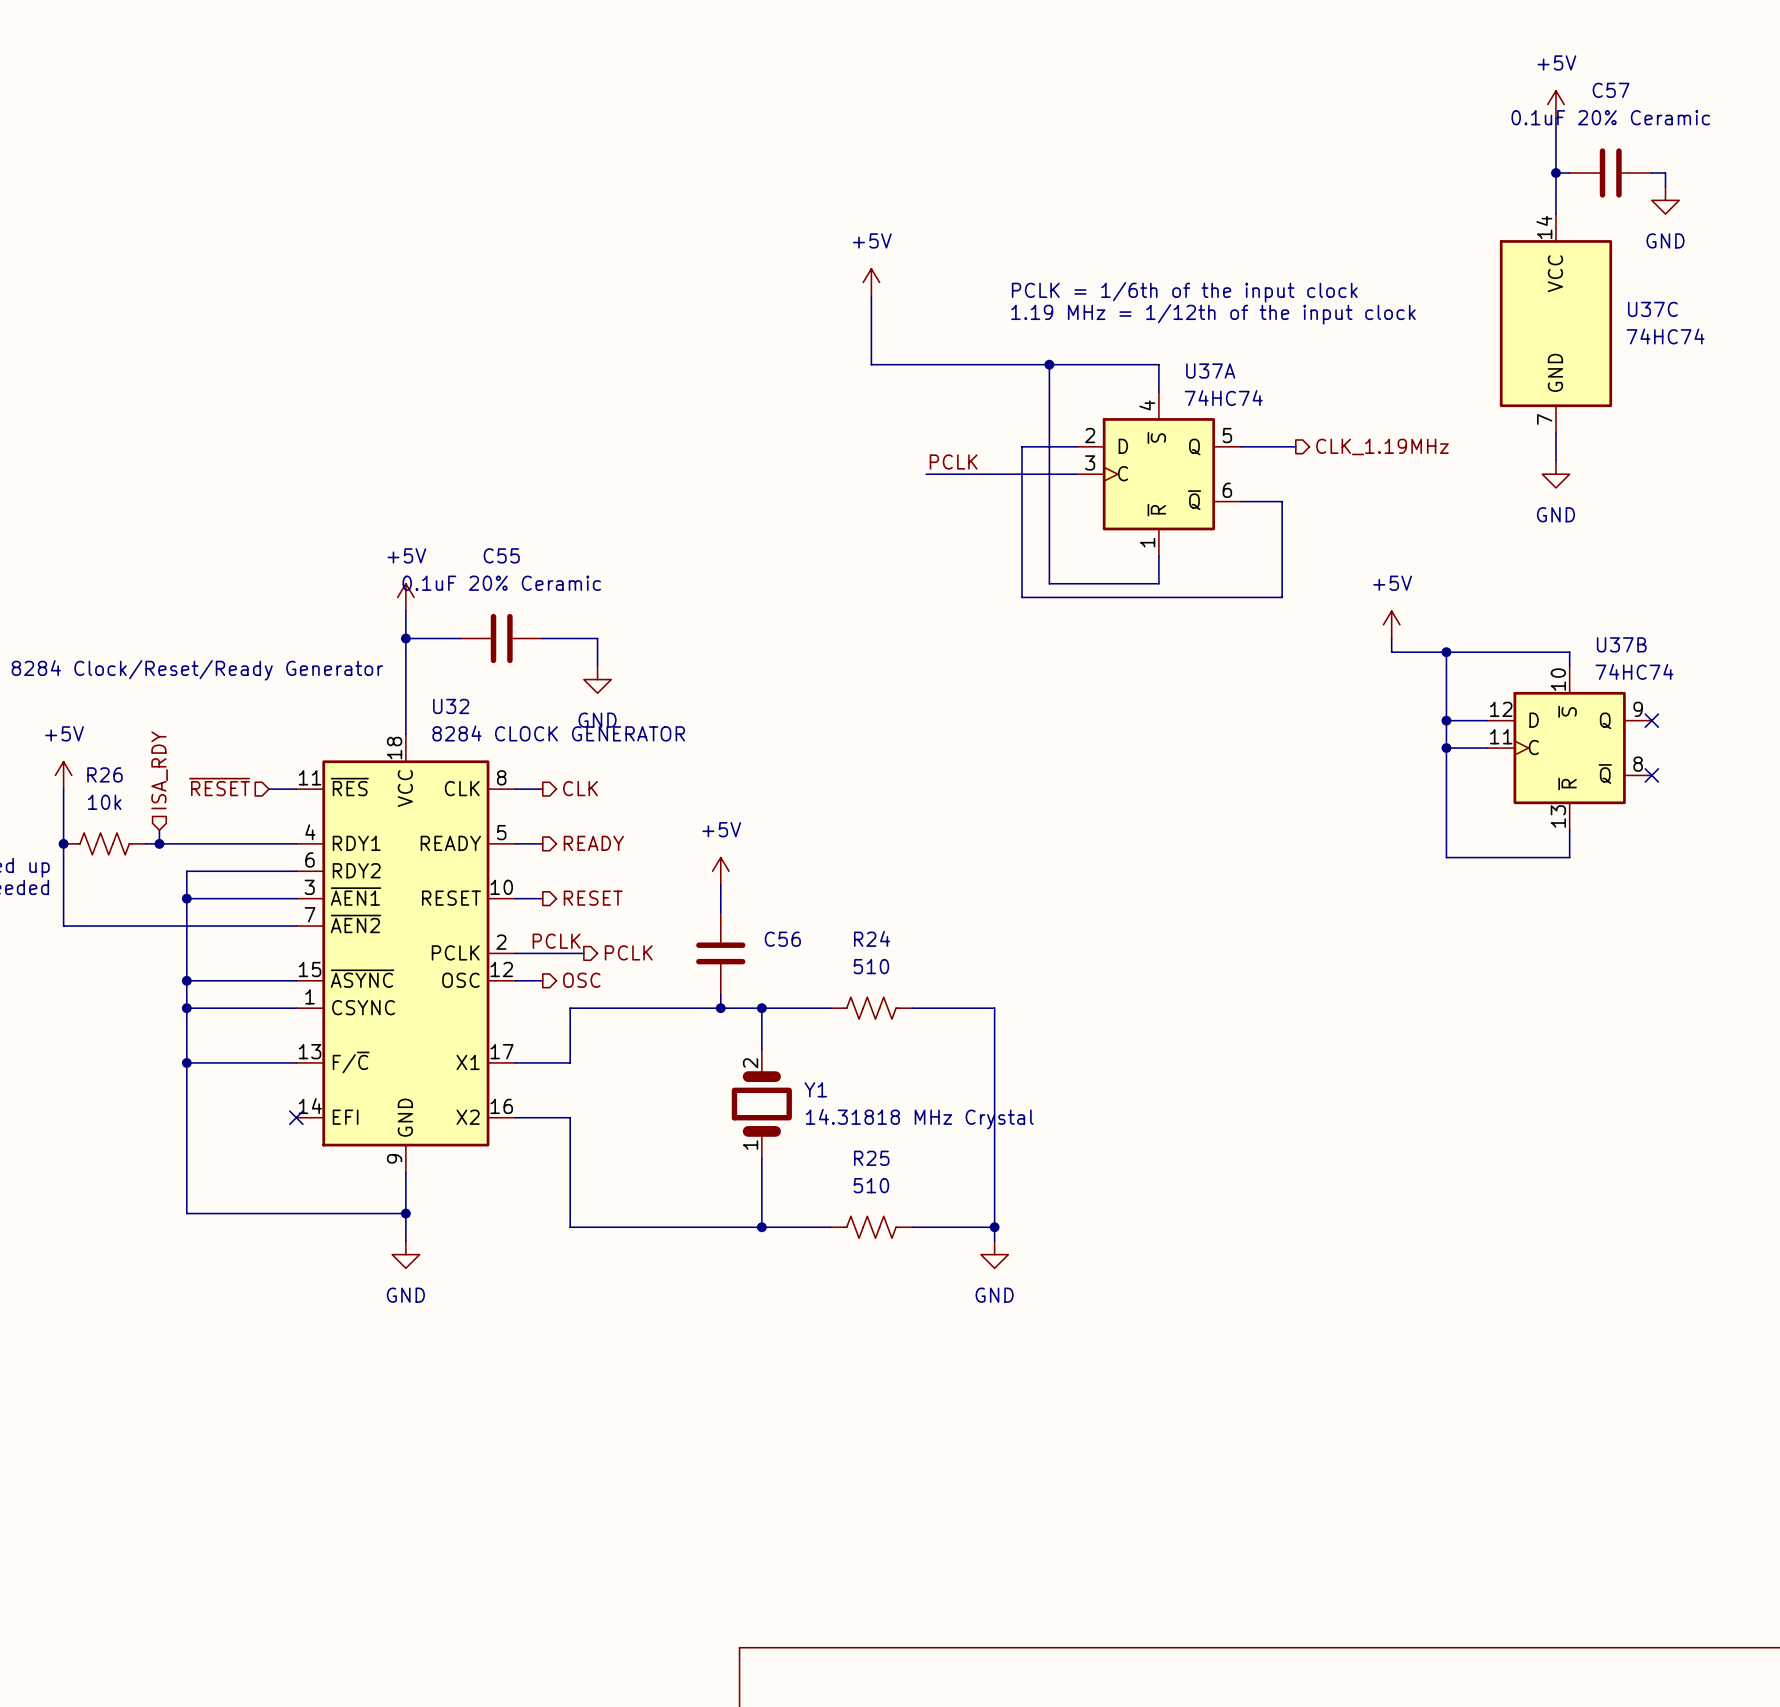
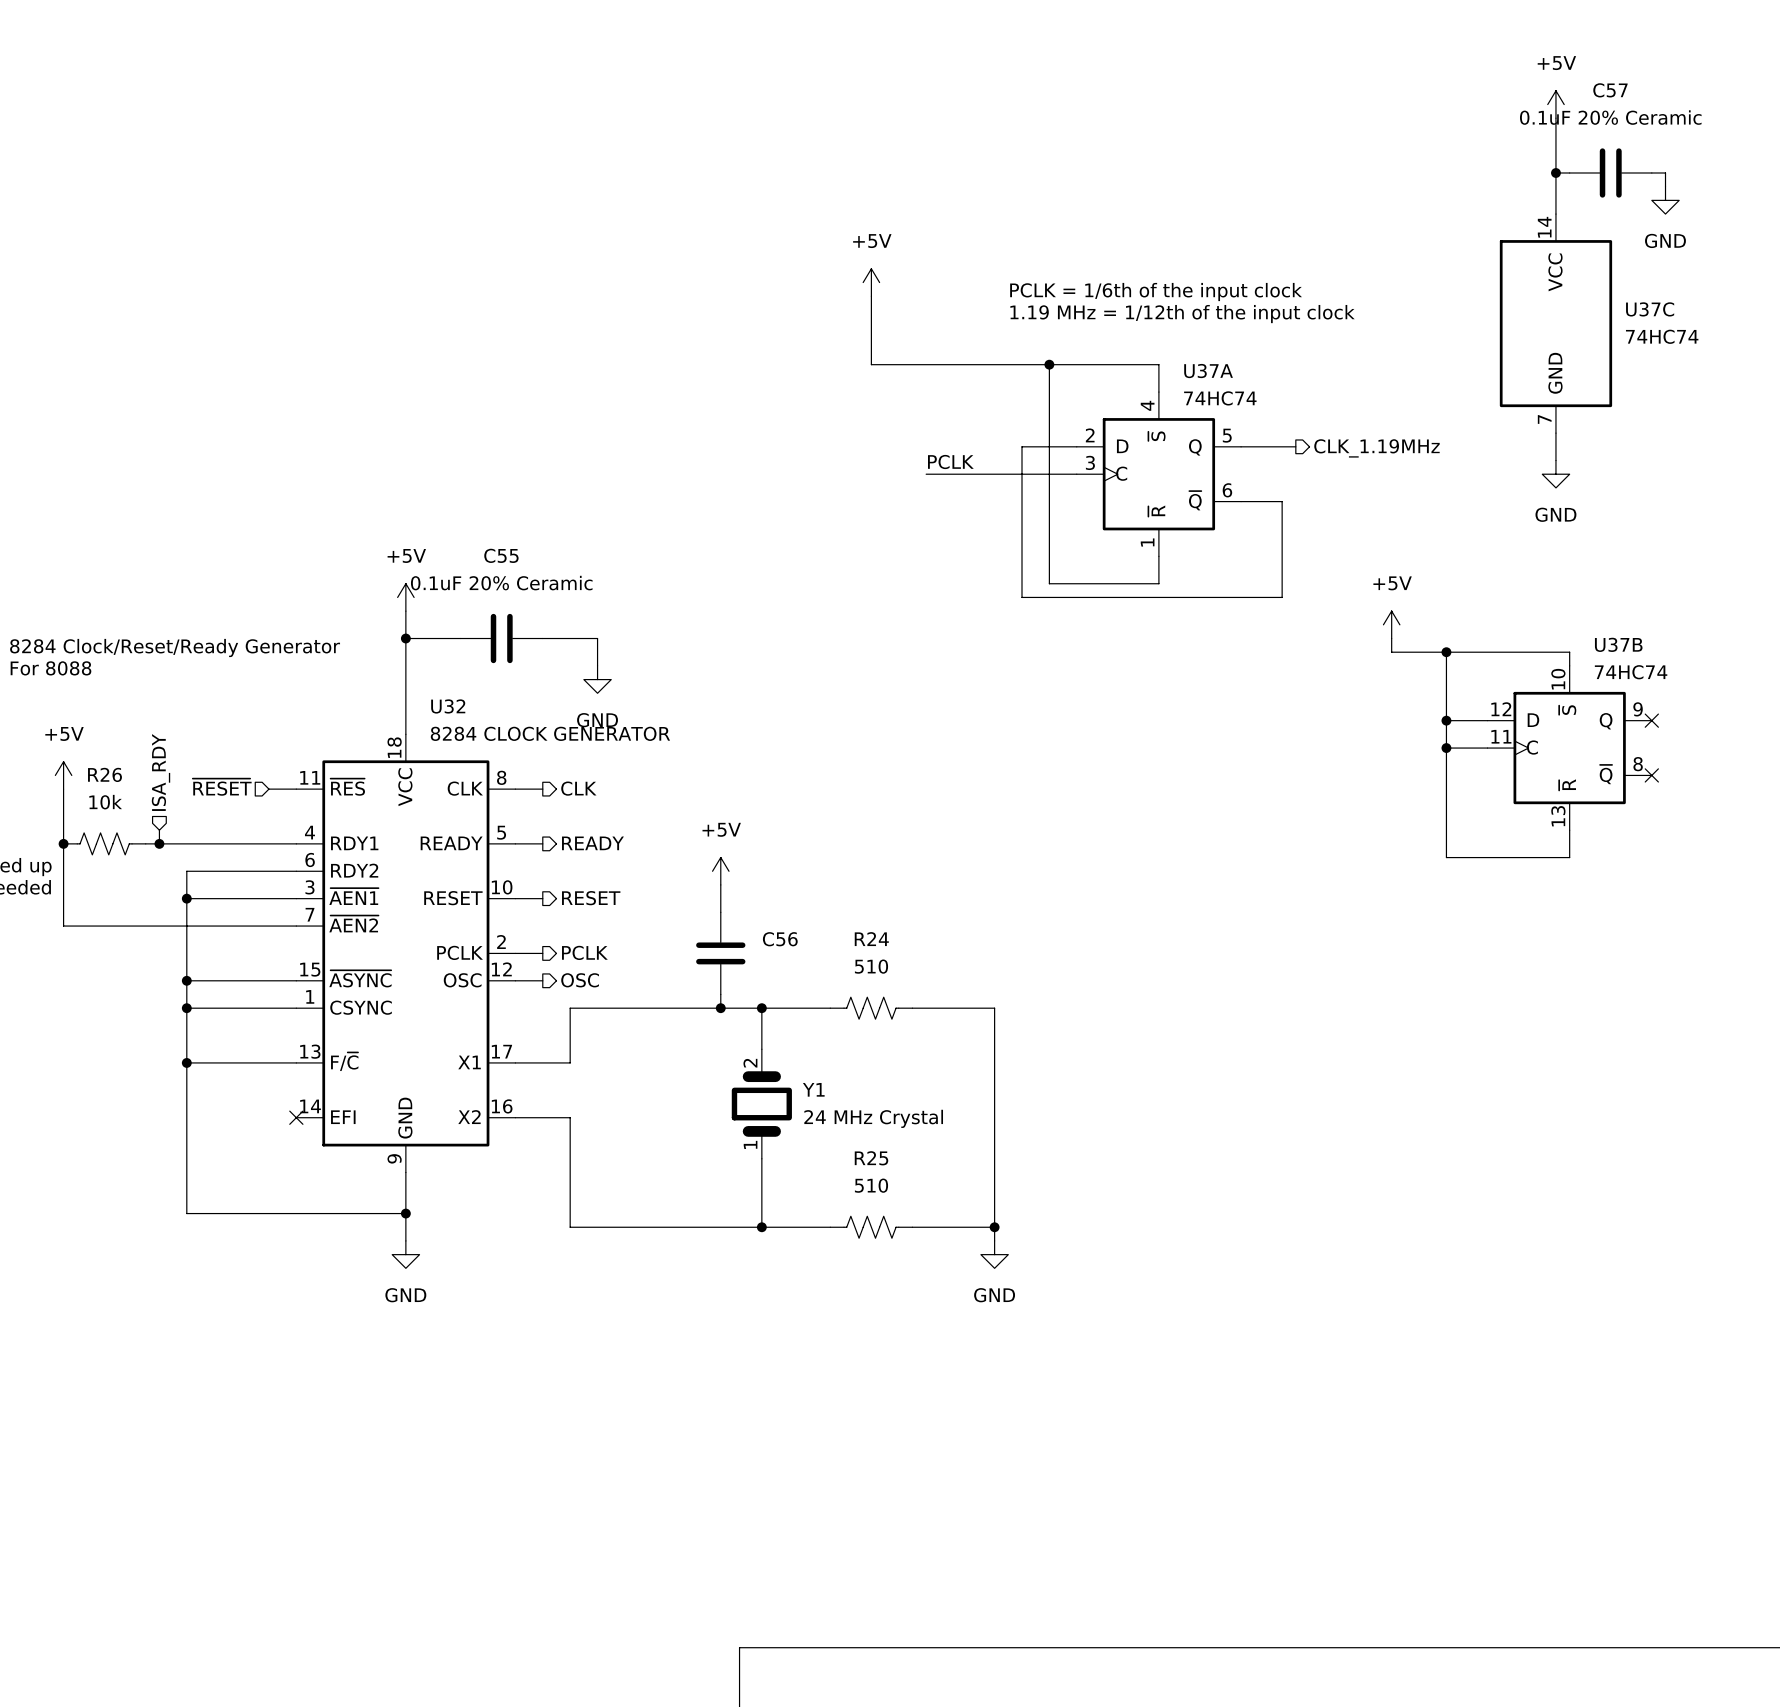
text: none -> 8284 Clock/Reset/Ready Generator (175, 647)
text: 8284 Clock/Reset/Ready Generator (197, 670) -> For 8088 (50, 668)
label: PCLK (556, 941) -> none
hierarchical label position: PCLK (628, 952) -> PCLK (584, 952)
wire: (542, 953) (583, 953) -> none
Y1 value: 14.31818 MHz Crystal (919, 1119) -> 24 MHz Crystal (873, 1118)

